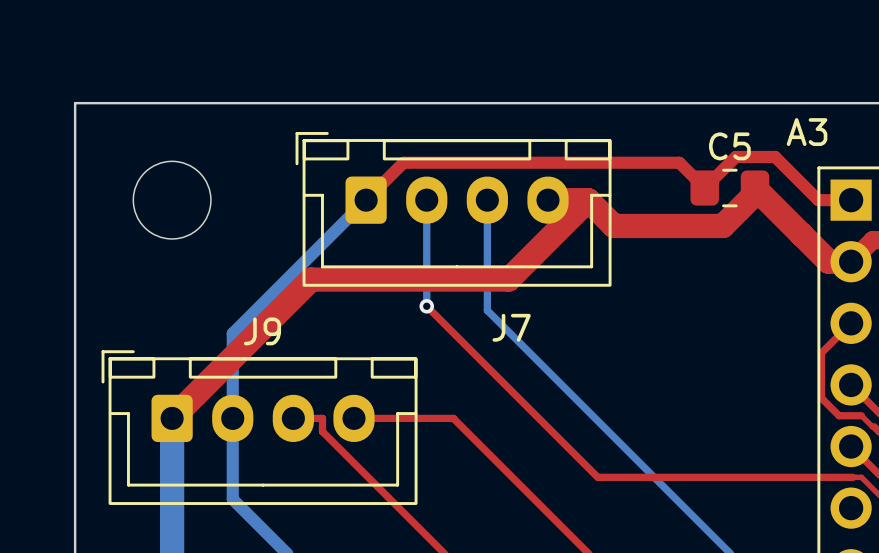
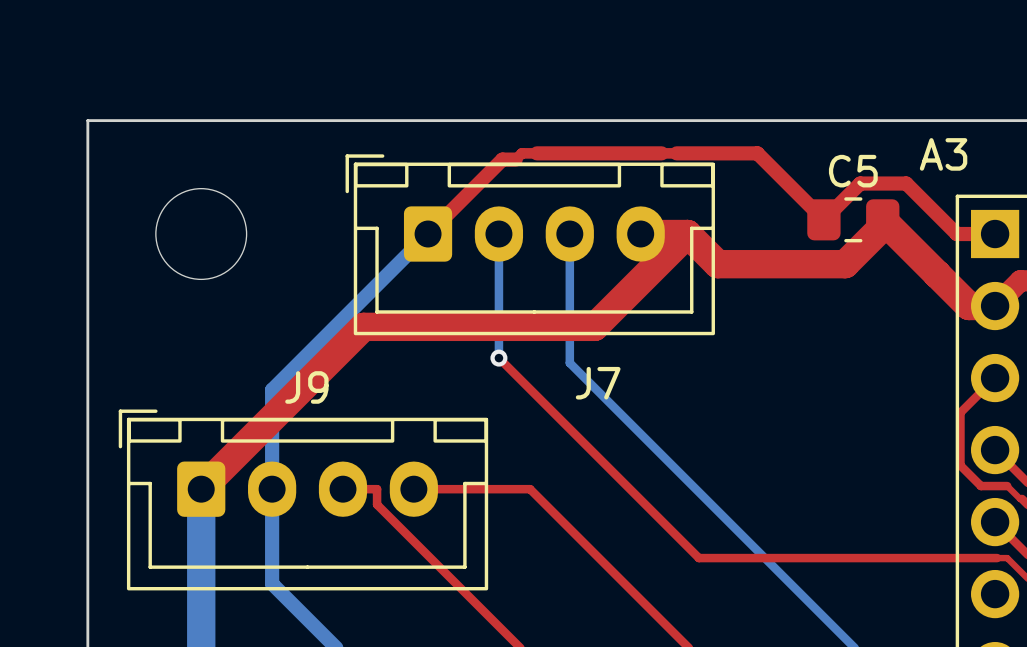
top track: (403, 162) (679, 162) -> (471, 190) (502, 159) (515, 159) (521, 153) (757, 153) (794, 190)

